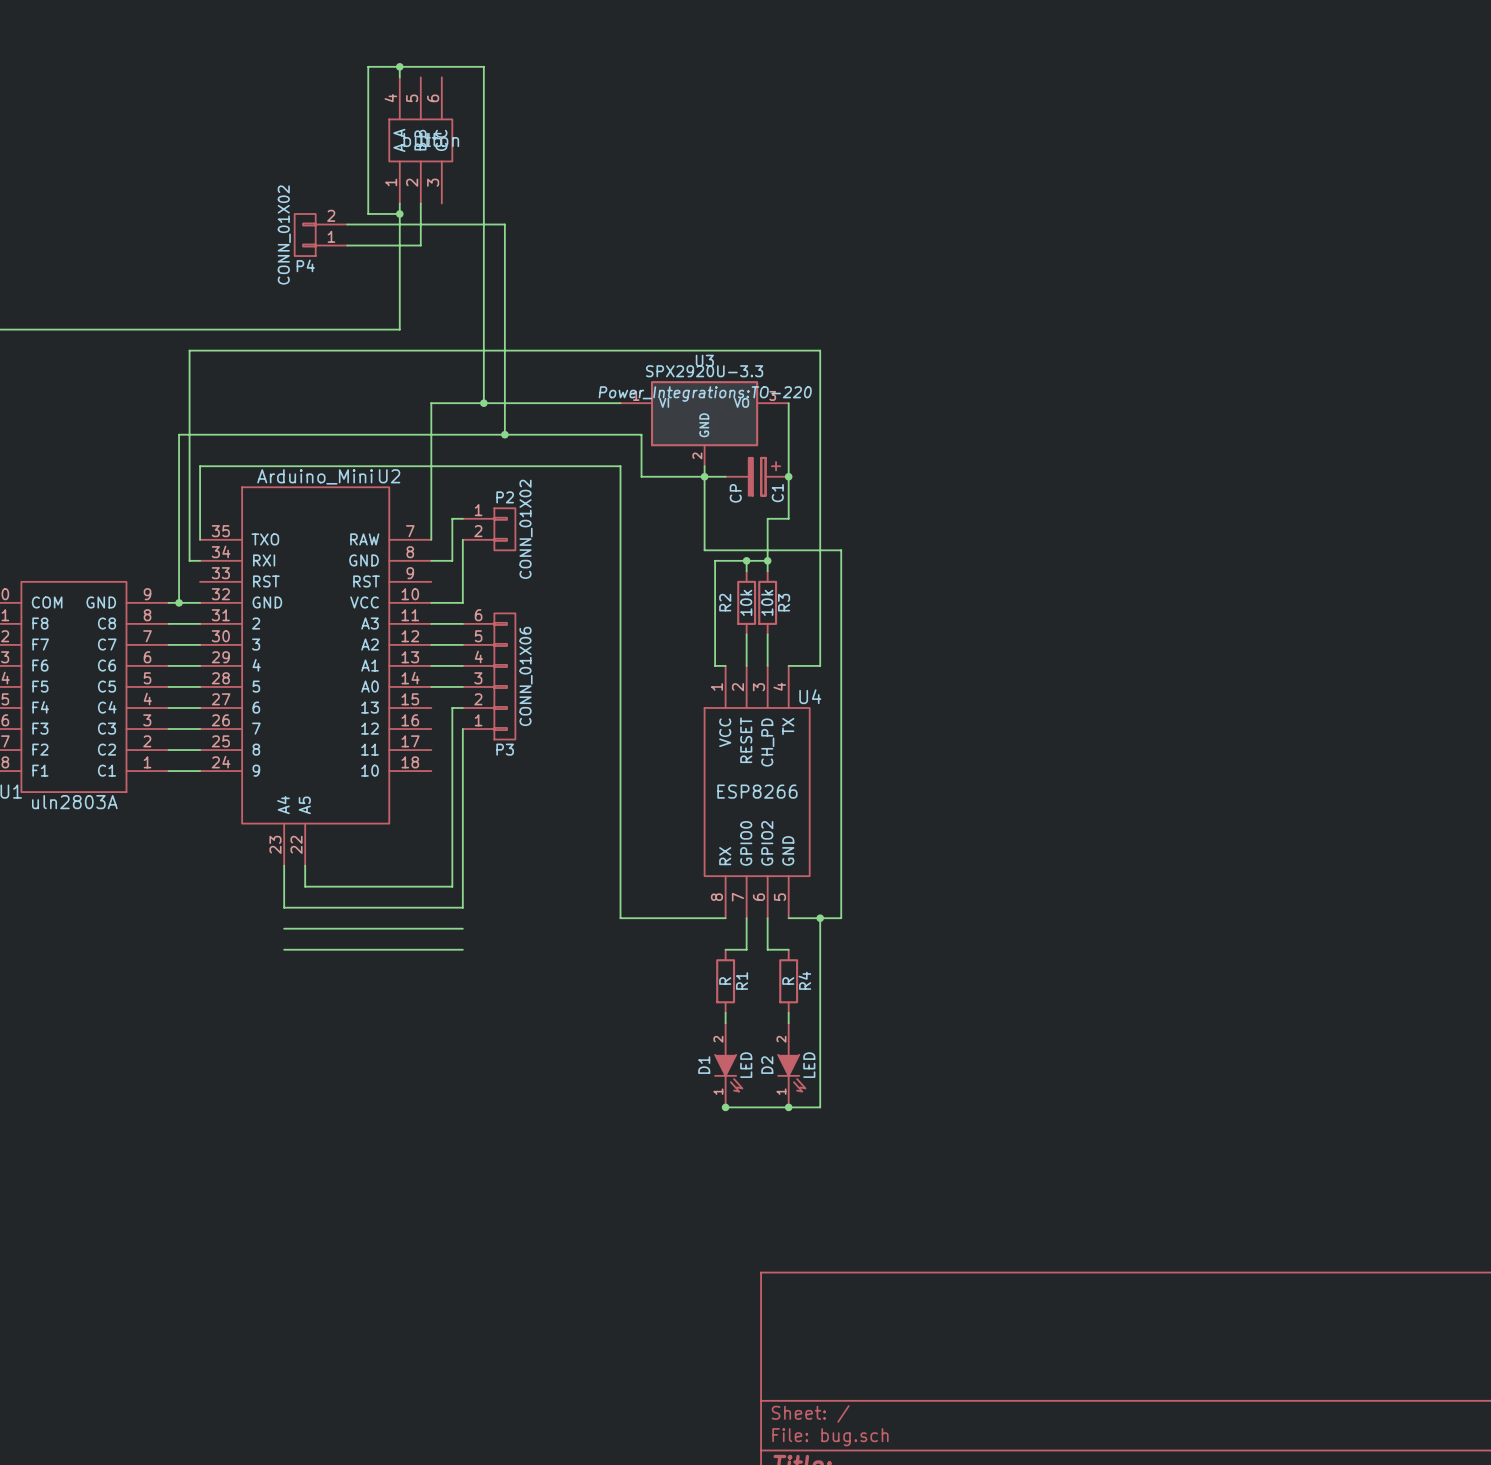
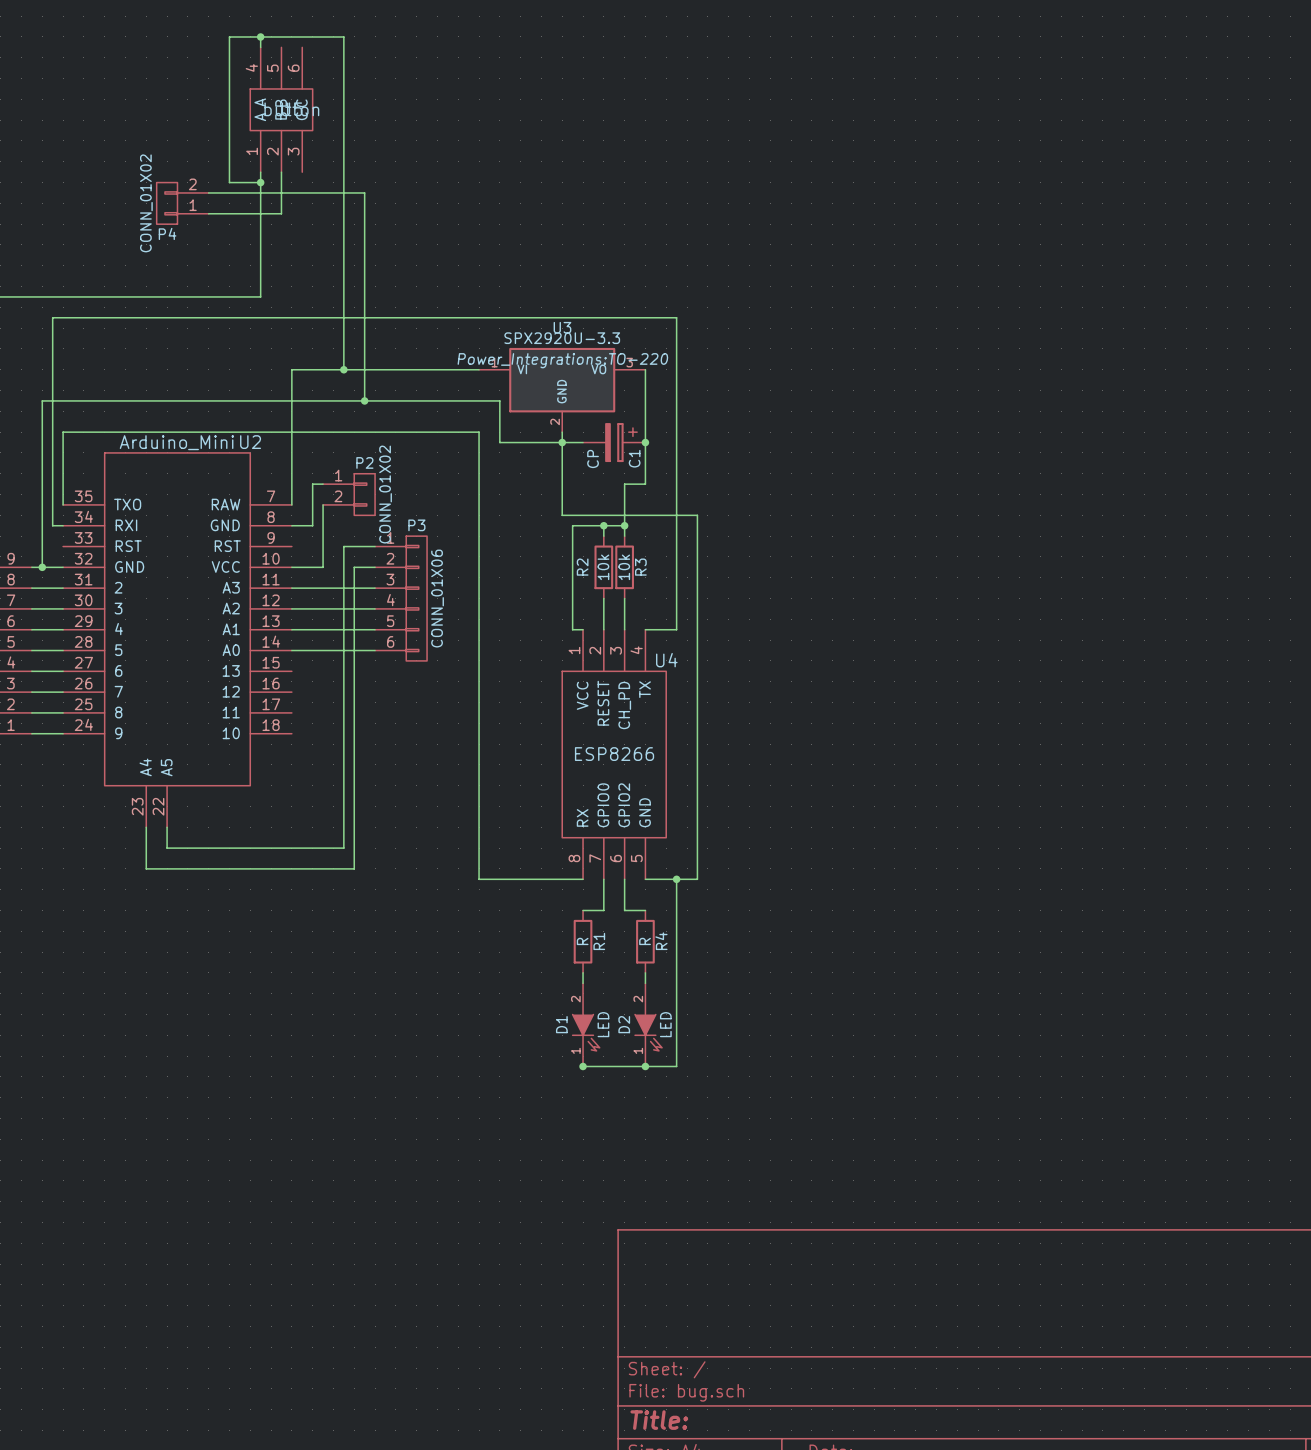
P3 flip: as is (504, 676) -> up-down (416, 598)
wire: (462, 707) (452, 707) (452, 886) -> (375, 546) (343, 546) (343, 848) (312, 848)
wire: (462, 729) (462, 907) -> (375, 567) (354, 567) (354, 868) (323, 868)
wire: (284, 928) (462, 928) -> none
wire: (284, 949) (462, 949) -> none

